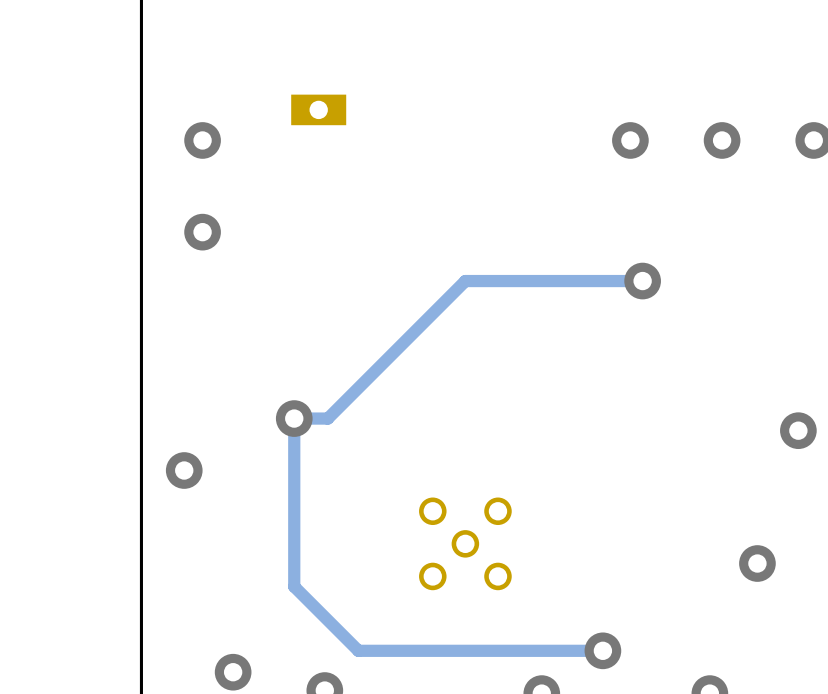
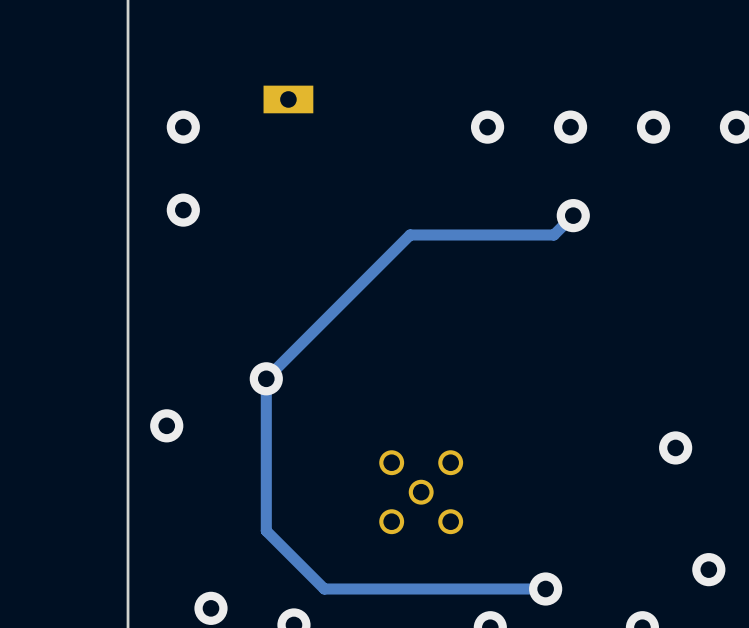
via: none -> (487, 127)
track: (642, 281) (465, 281) (327, 418) (294, 418) -> (573, 215) (553, 234) (410, 234) (266, 378)
via position: (642, 281) -> (573, 215)
via: (798, 430) -> none
via: none -> (675, 447)
via: (757, 563) -> none
via: none -> (708, 569)

